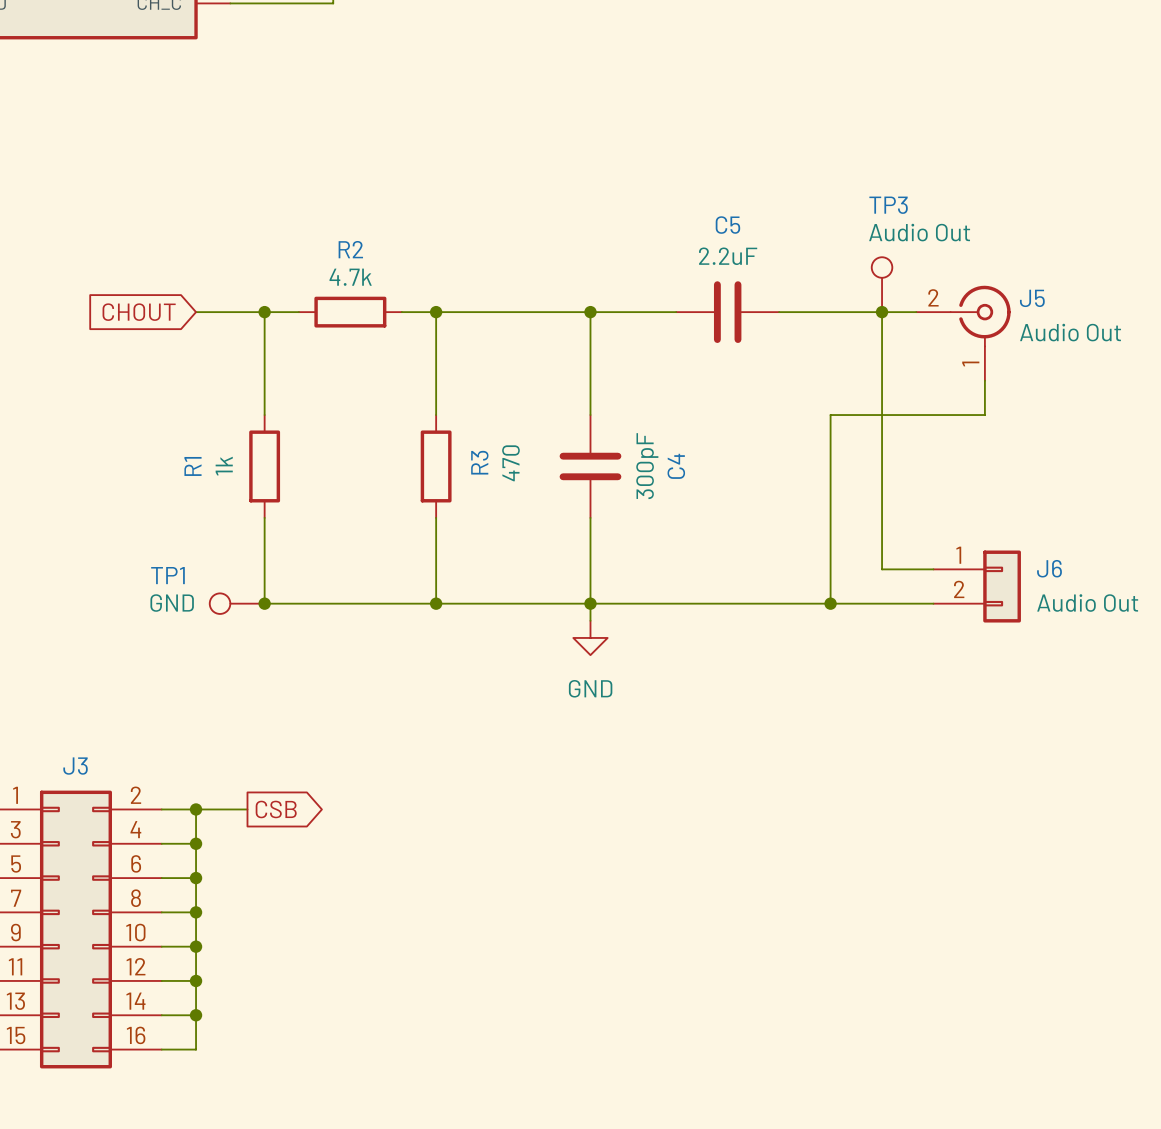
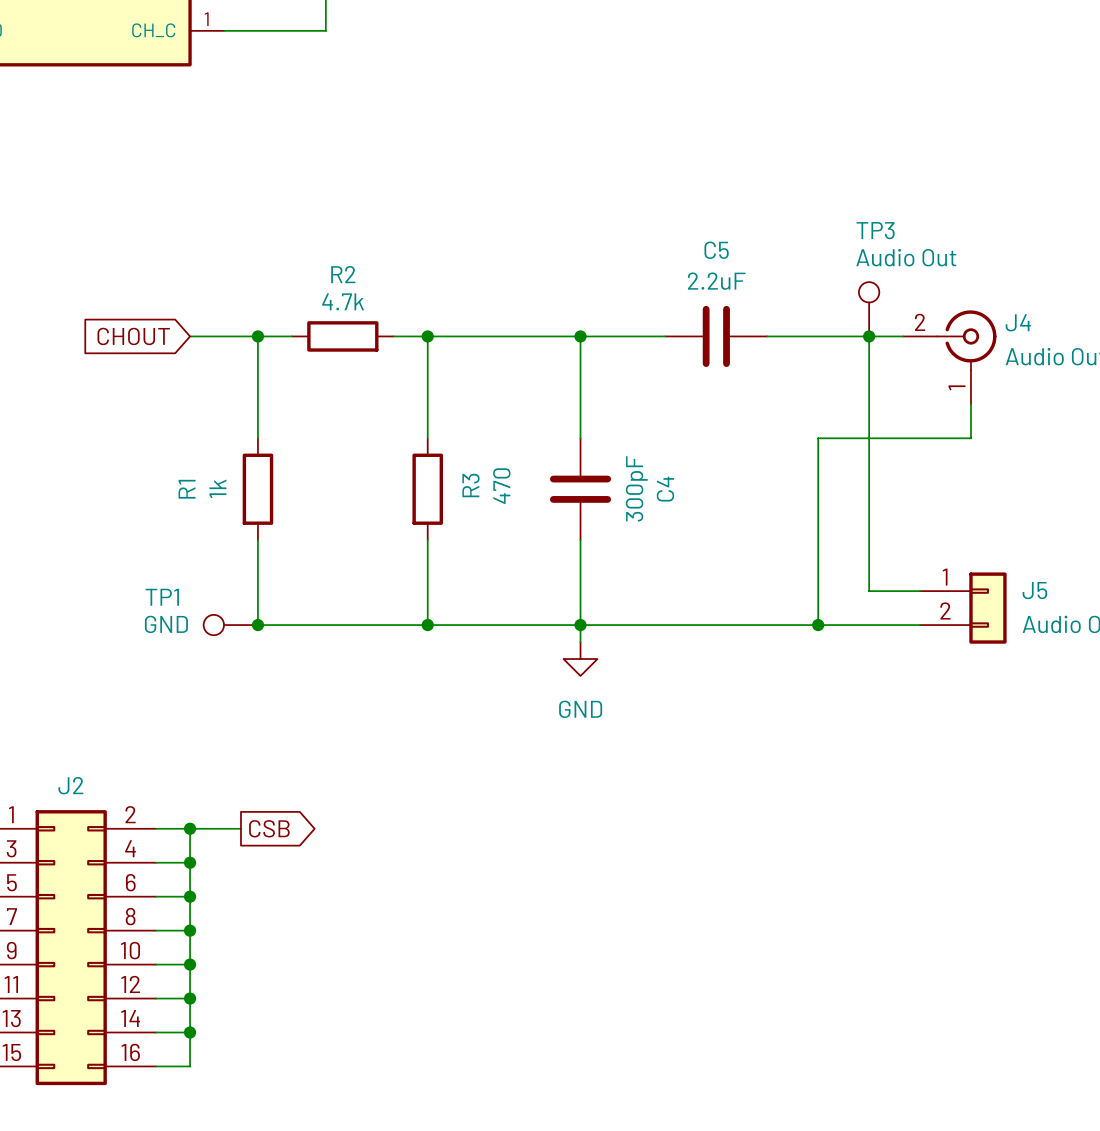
J5 name: J5 (1032, 298) -> J4 (1018, 322)
J6 name: J6 (1049, 568) -> J5 (1034, 590)
J3 name: J3 (75, 766) -> J2 (70, 785)

